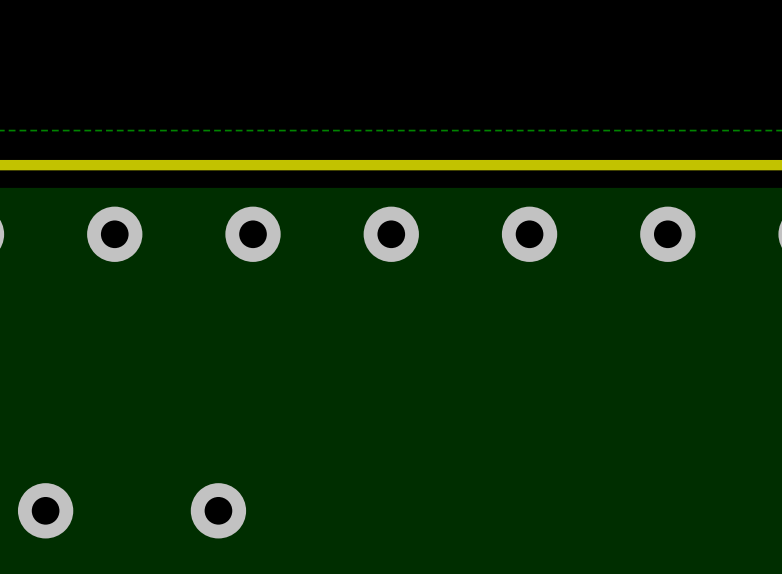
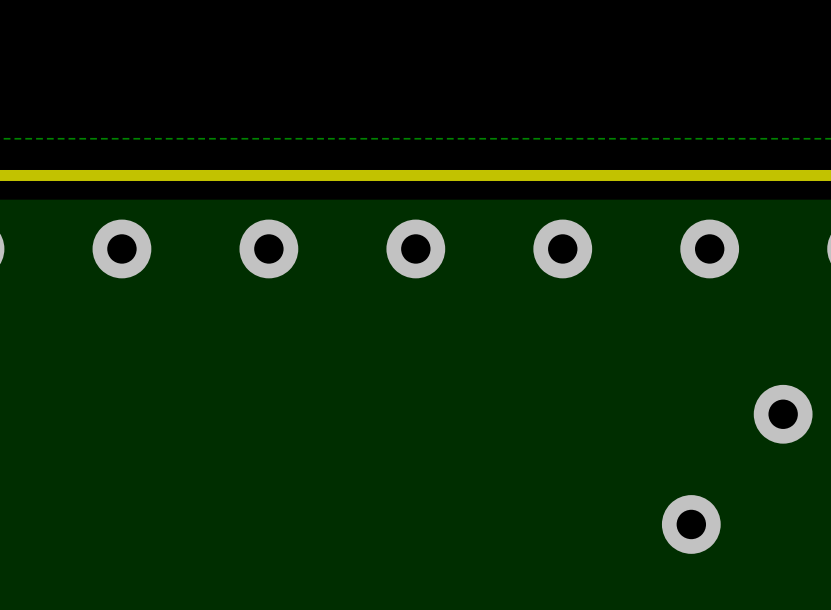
via: none -> (783, 414)
via: none -> (691, 524)
via: (45, 510) -> none
via: (218, 510) -> none

